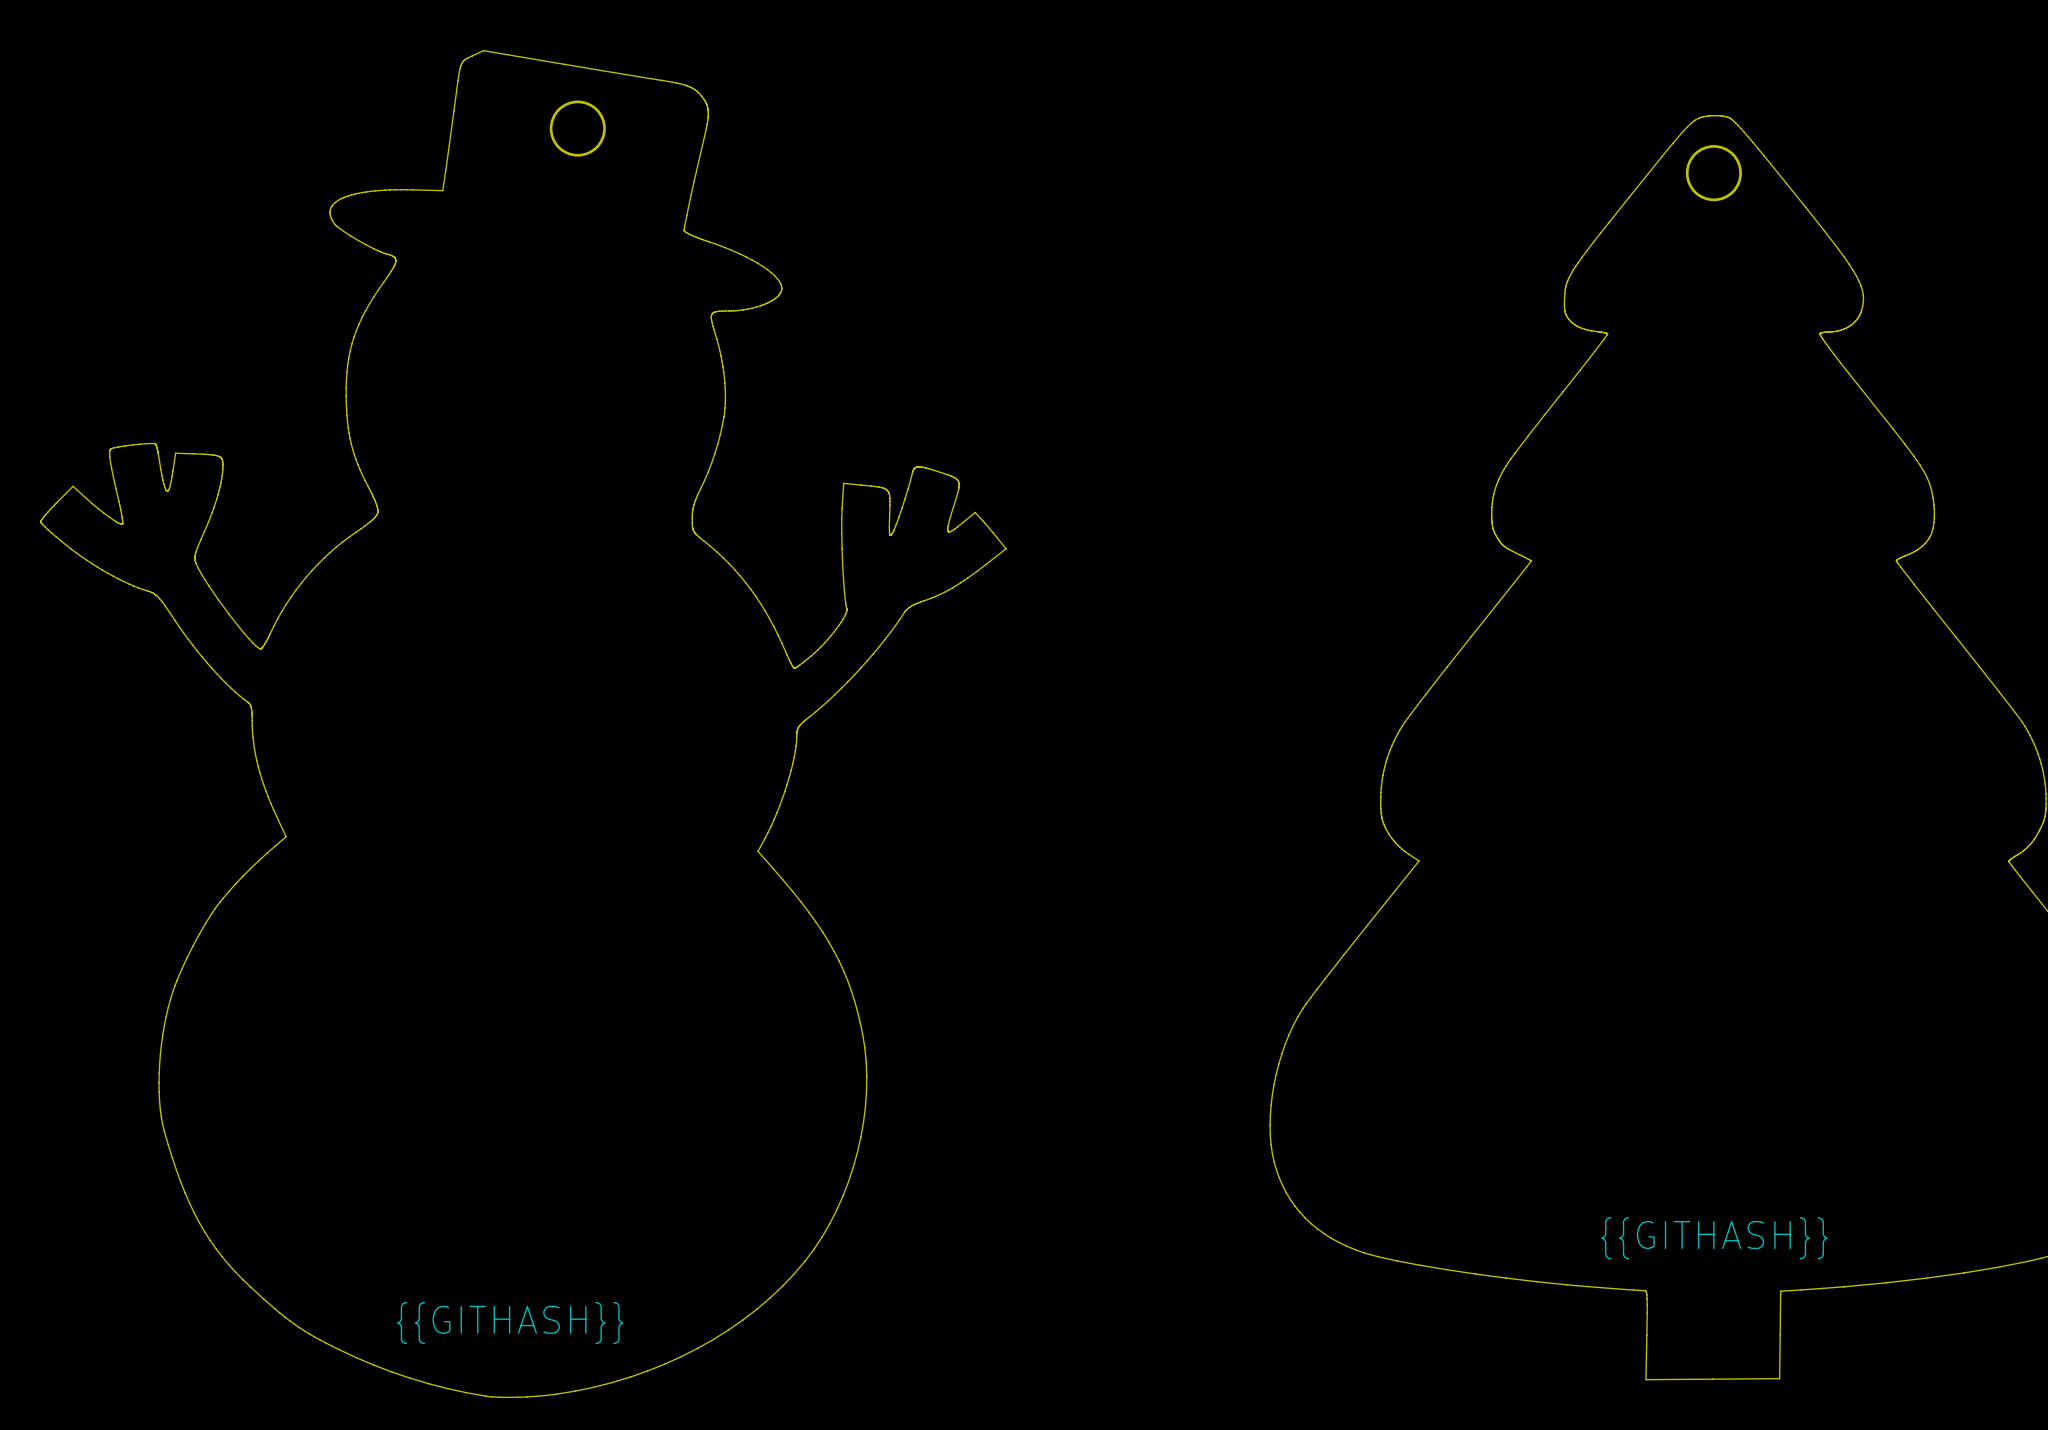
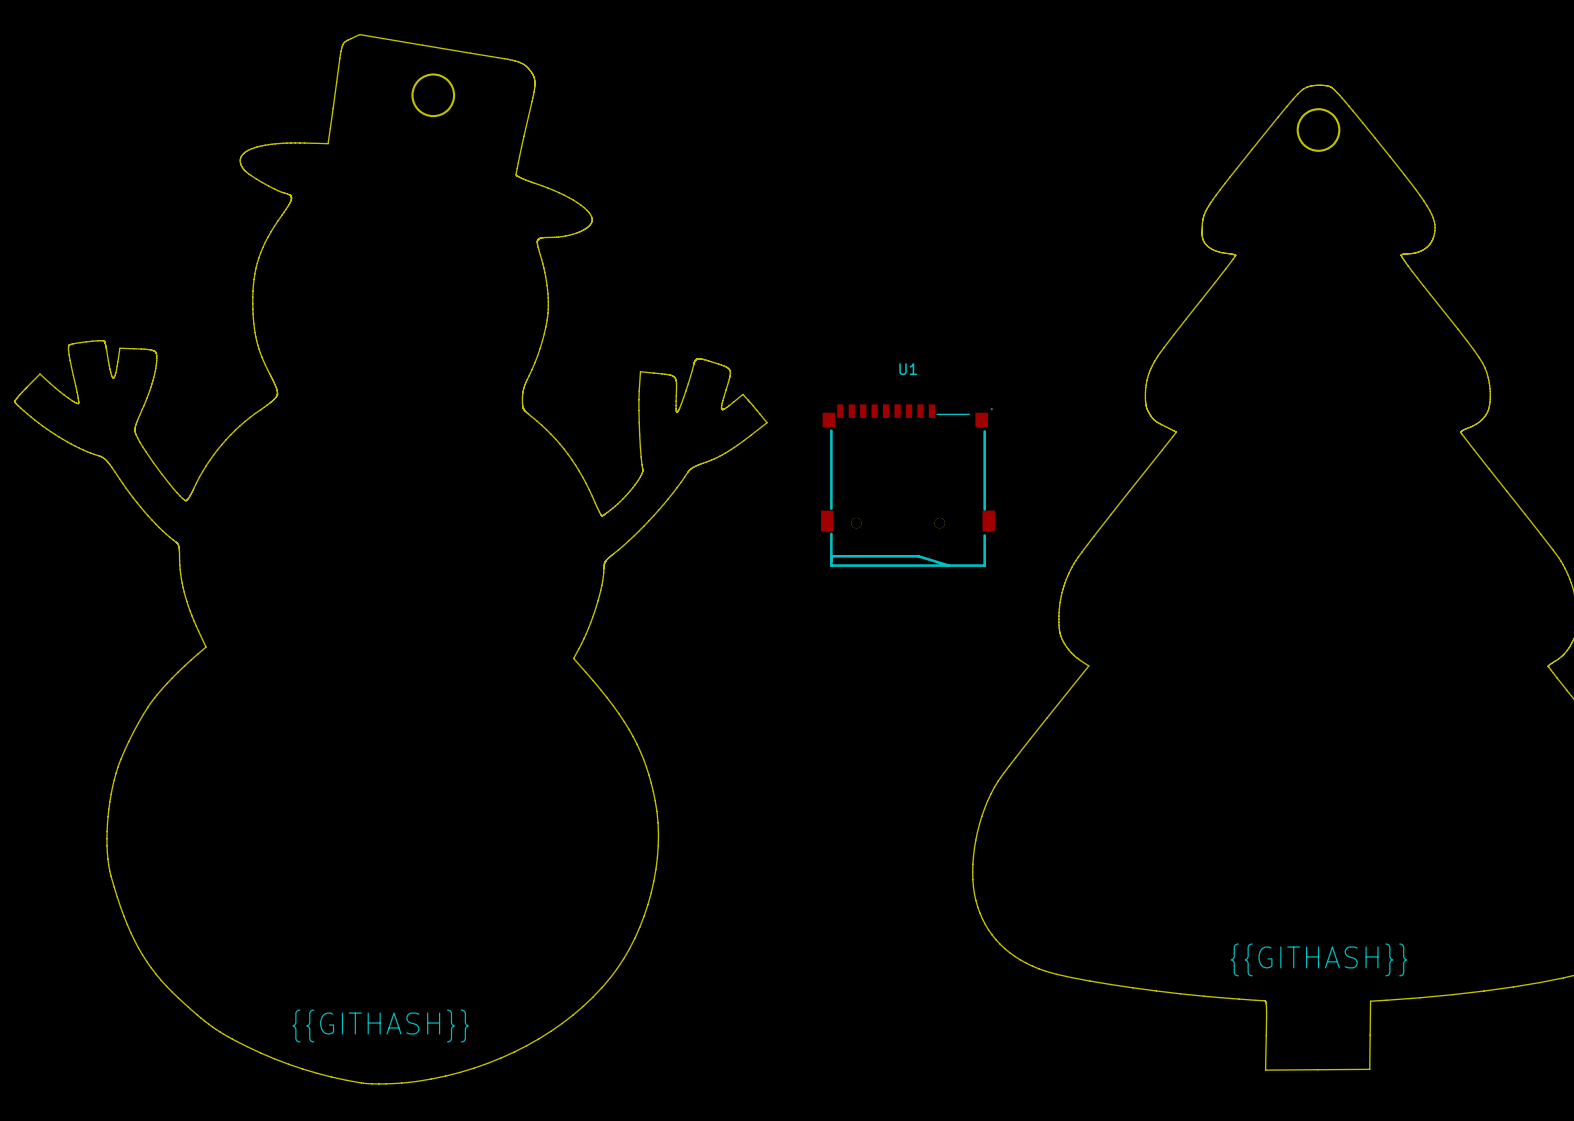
U1: none -> (907, 485)

